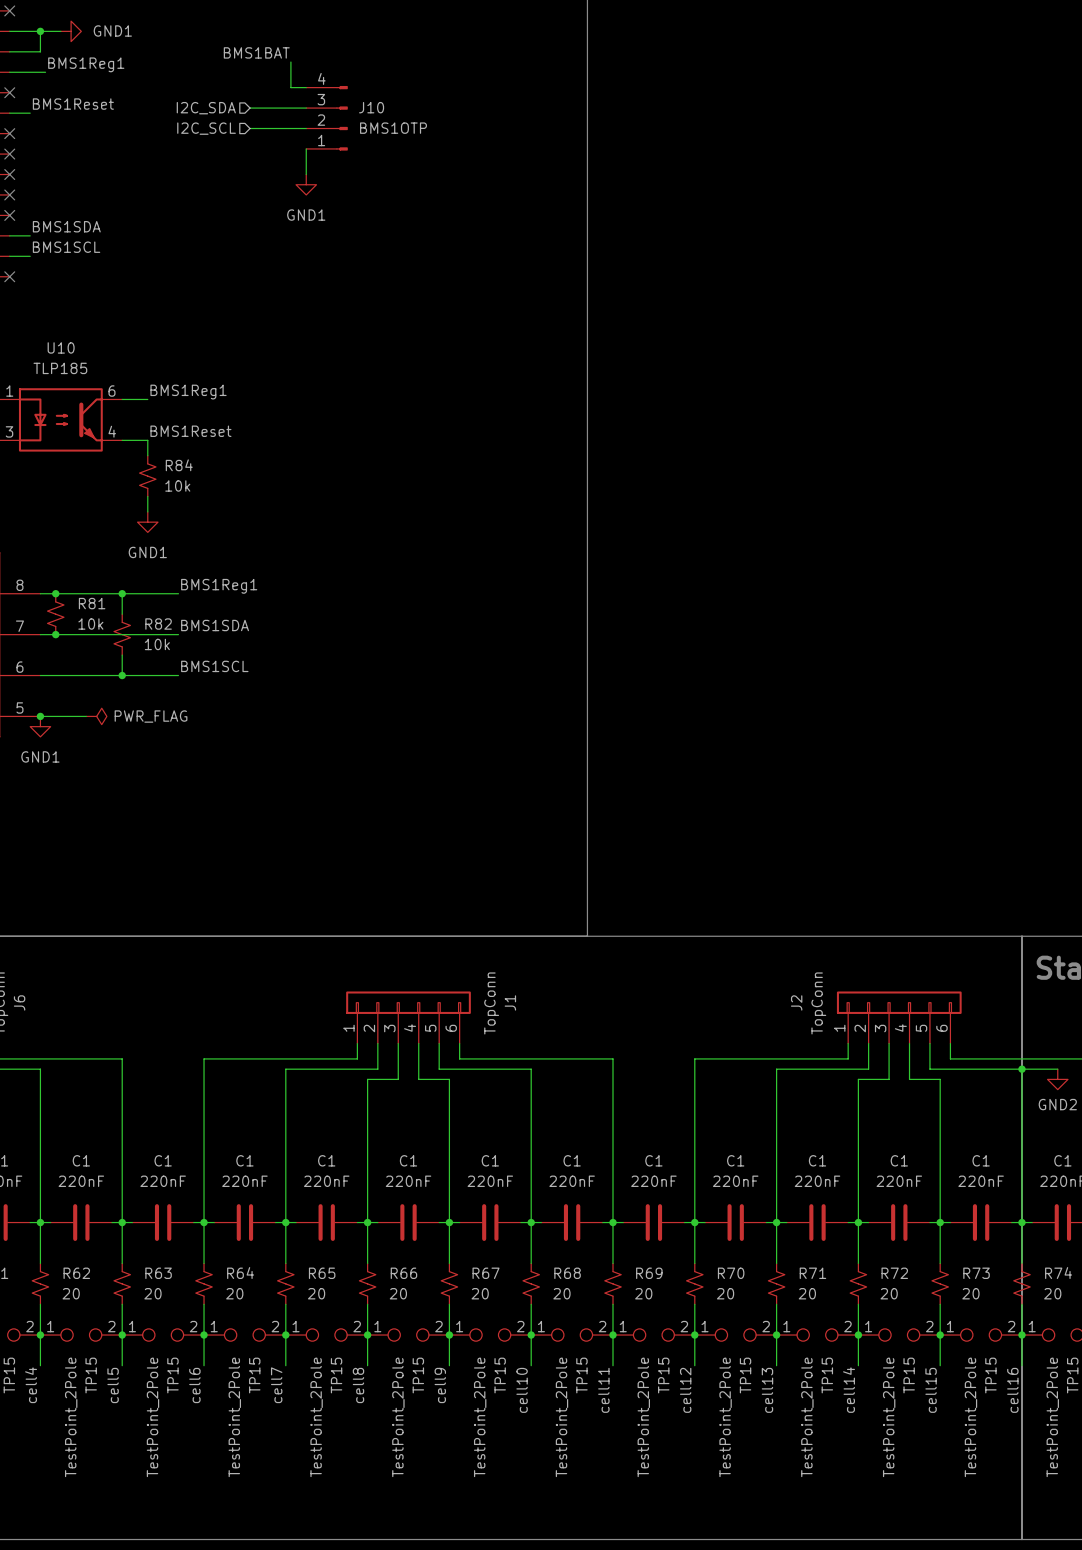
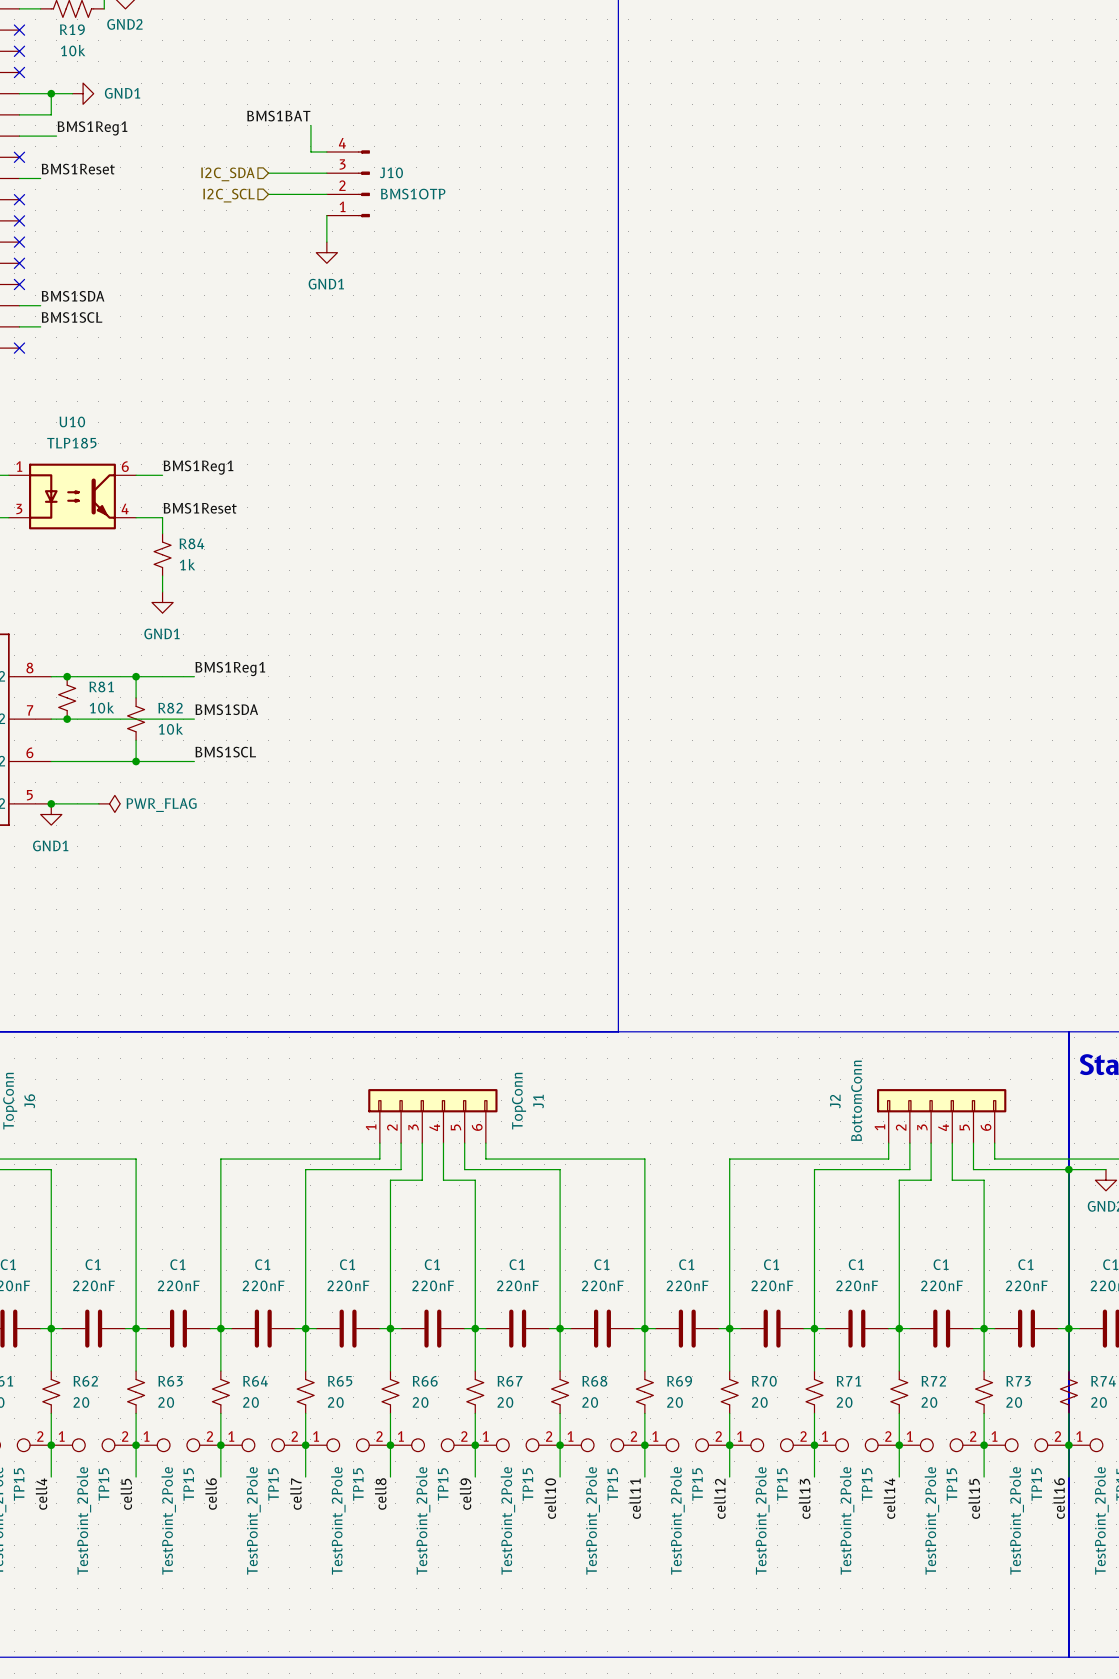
R84 value: 10k (177, 485) -> 1k (187, 564)
J2 value: TopConn (818, 1003) -> BottomConn (856, 1100)

